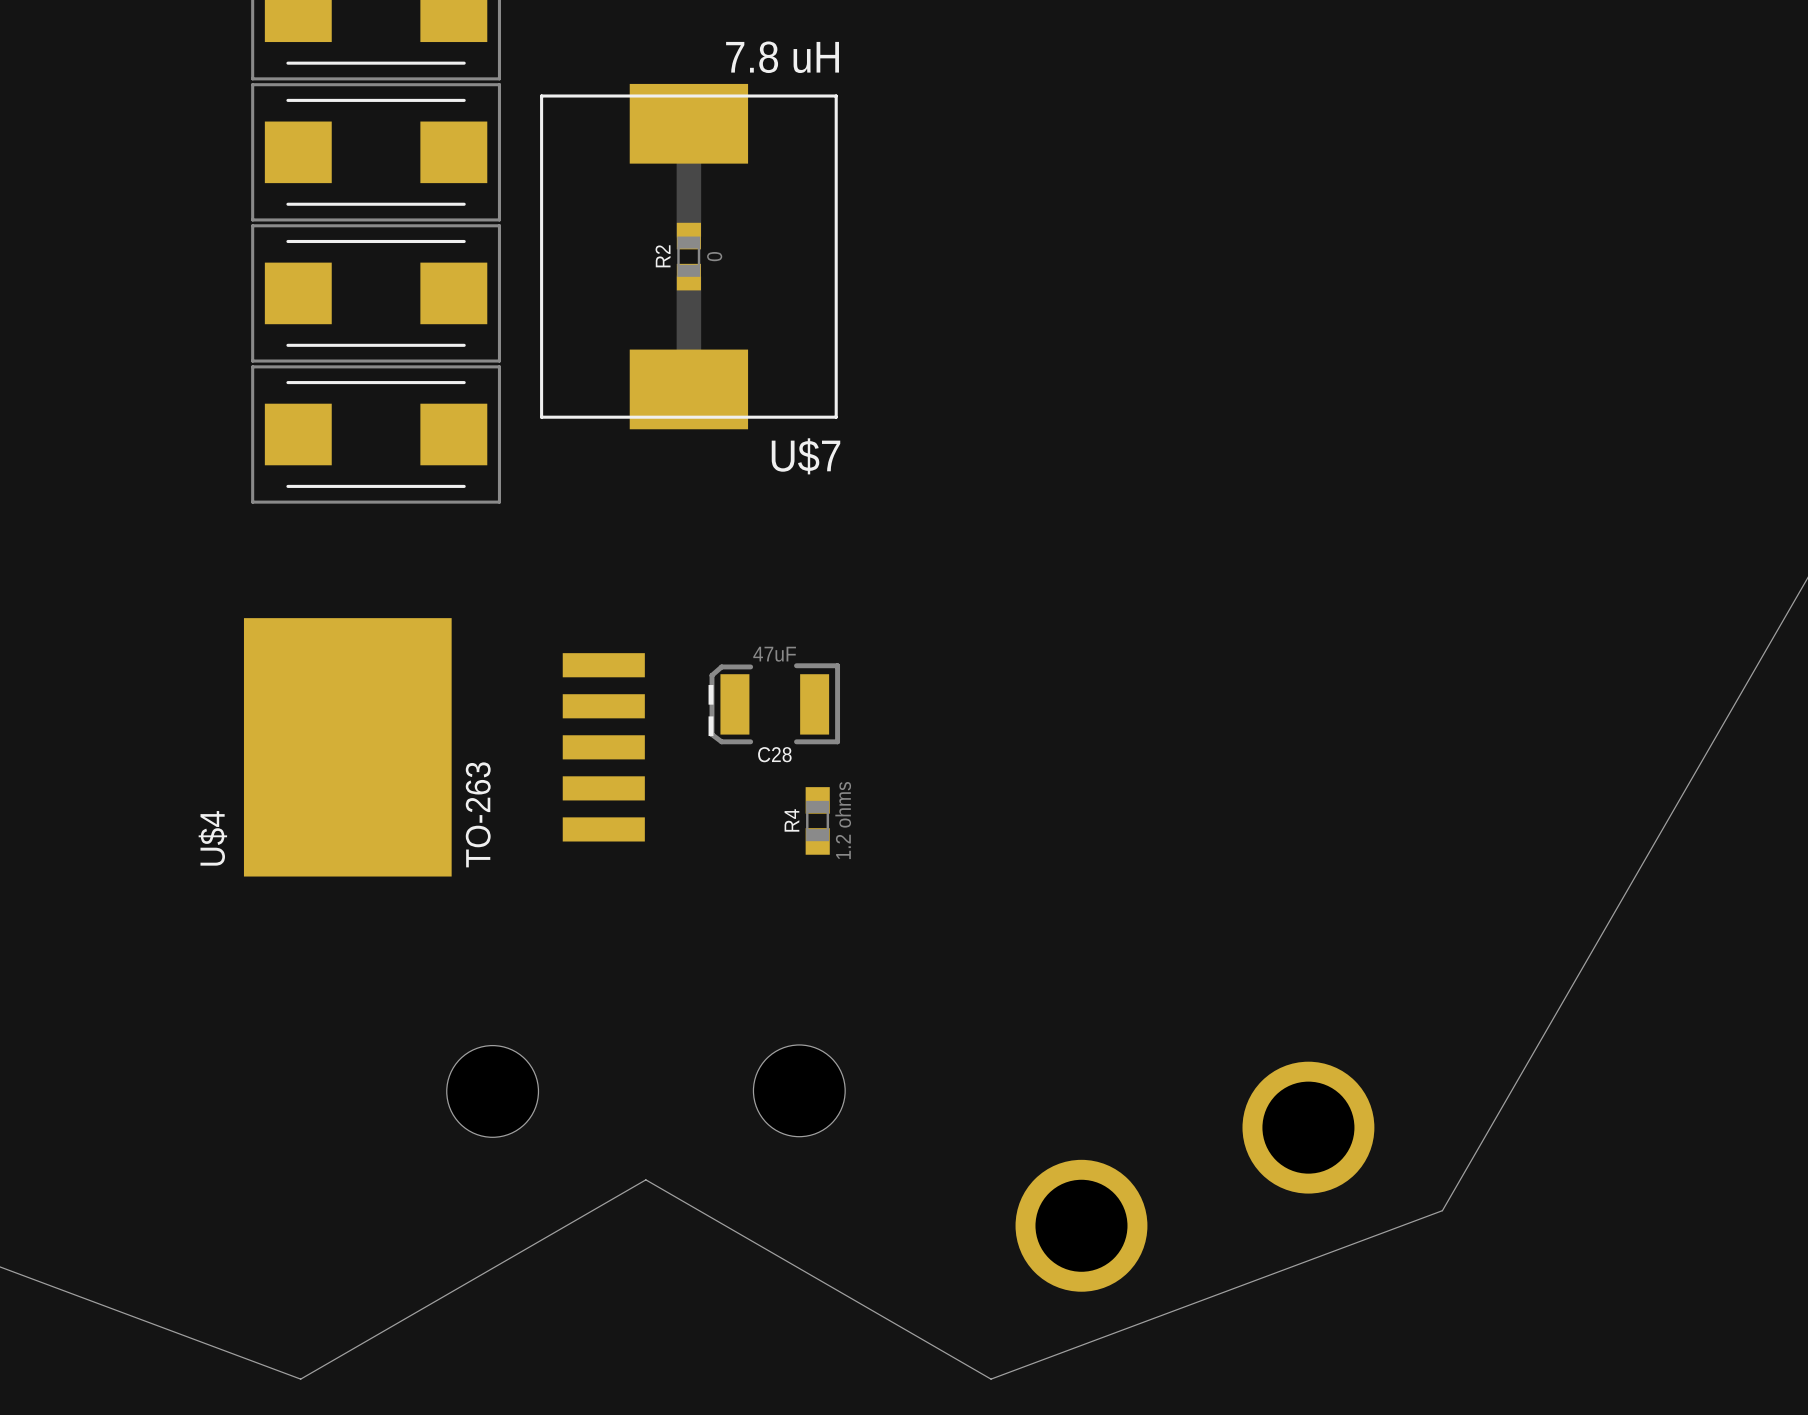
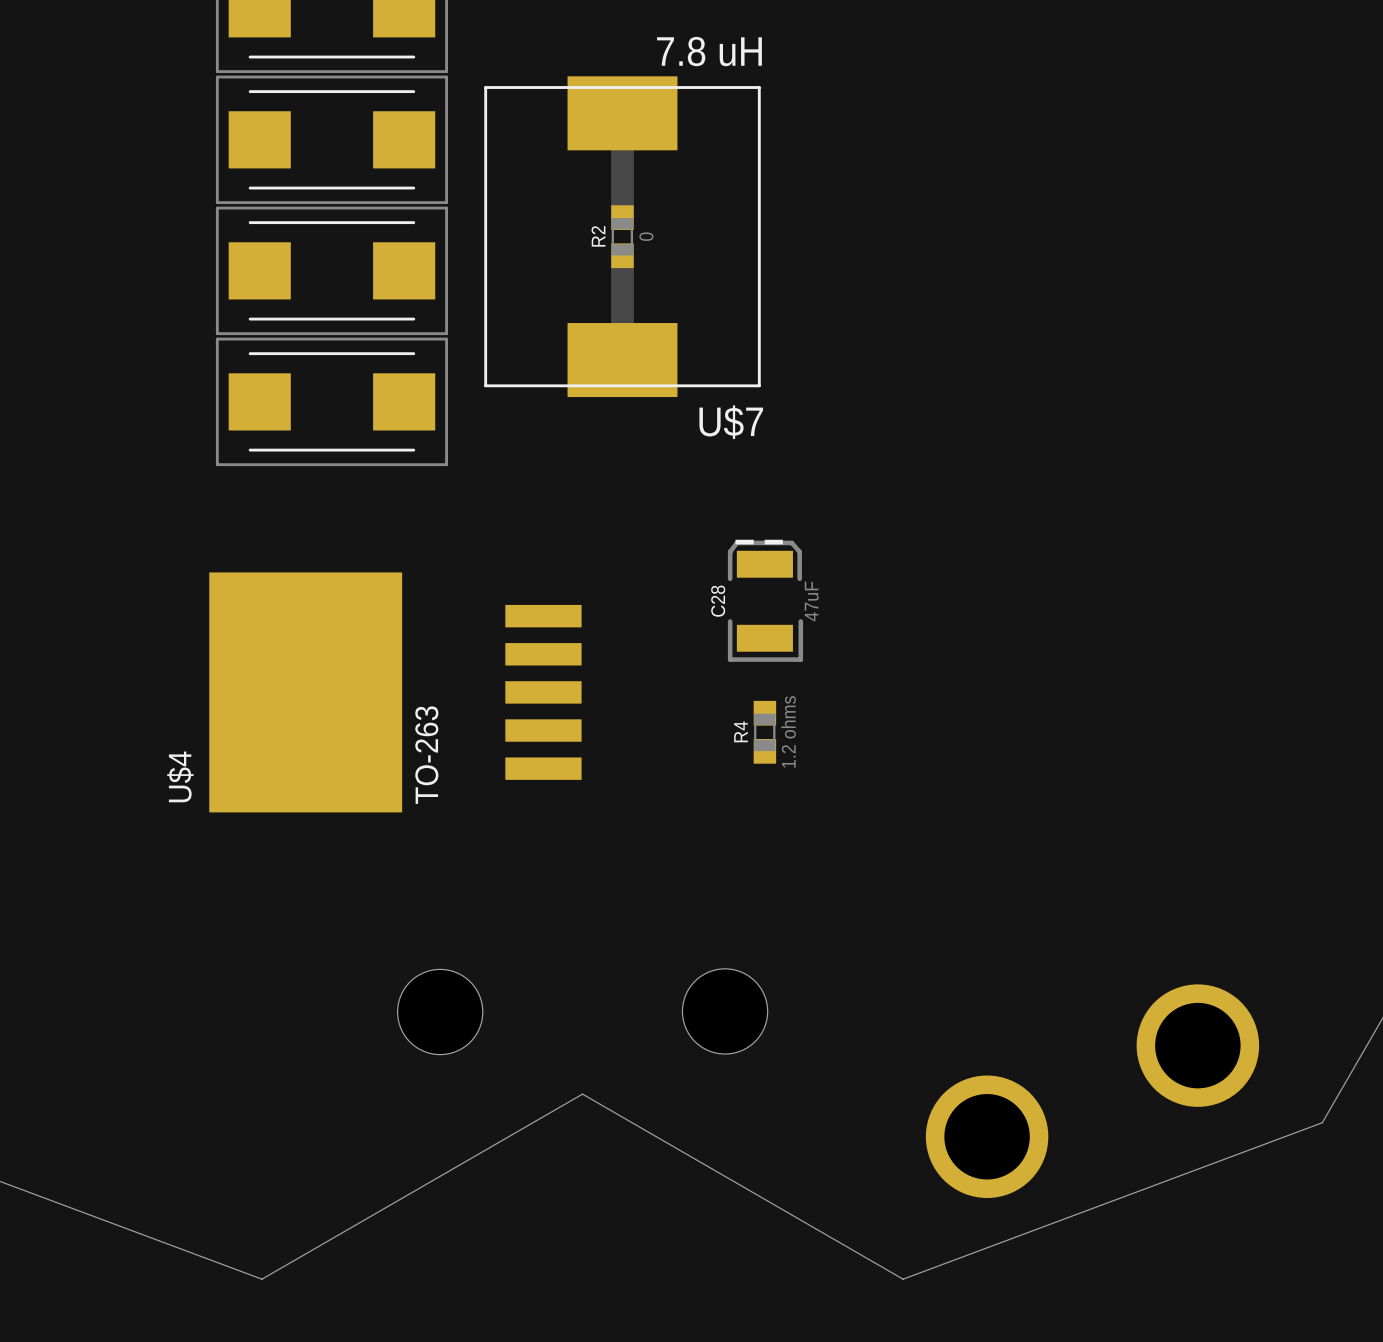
C28 rotation: 0° (774, 703) -> 90° clockwise (765, 600)
C28 position: (774, 703) -> (765, 600)
R4 position: (817, 820) -> (764, 732)

